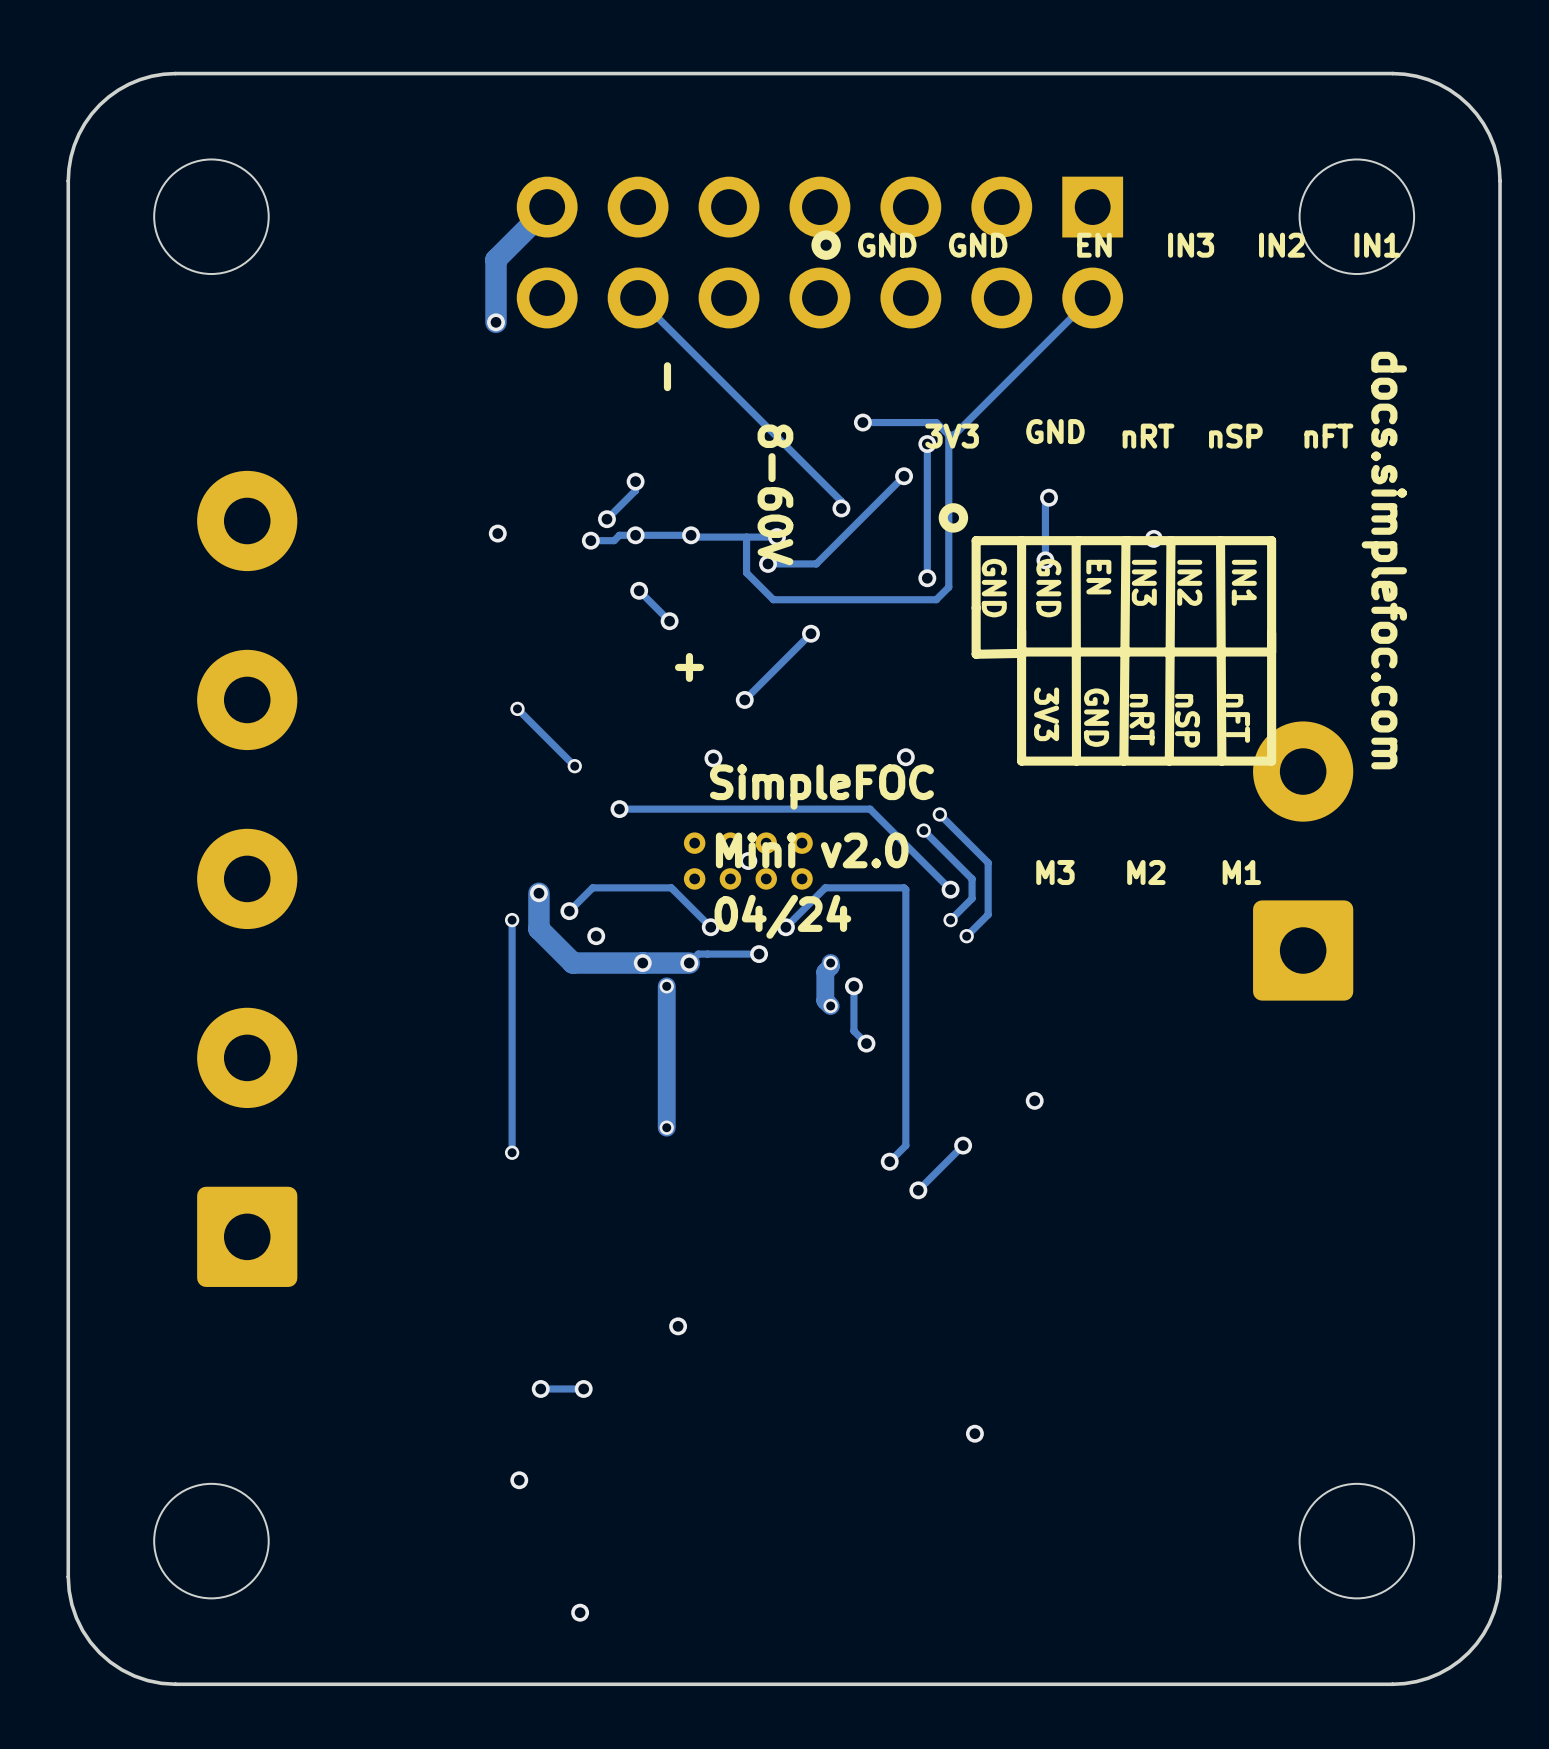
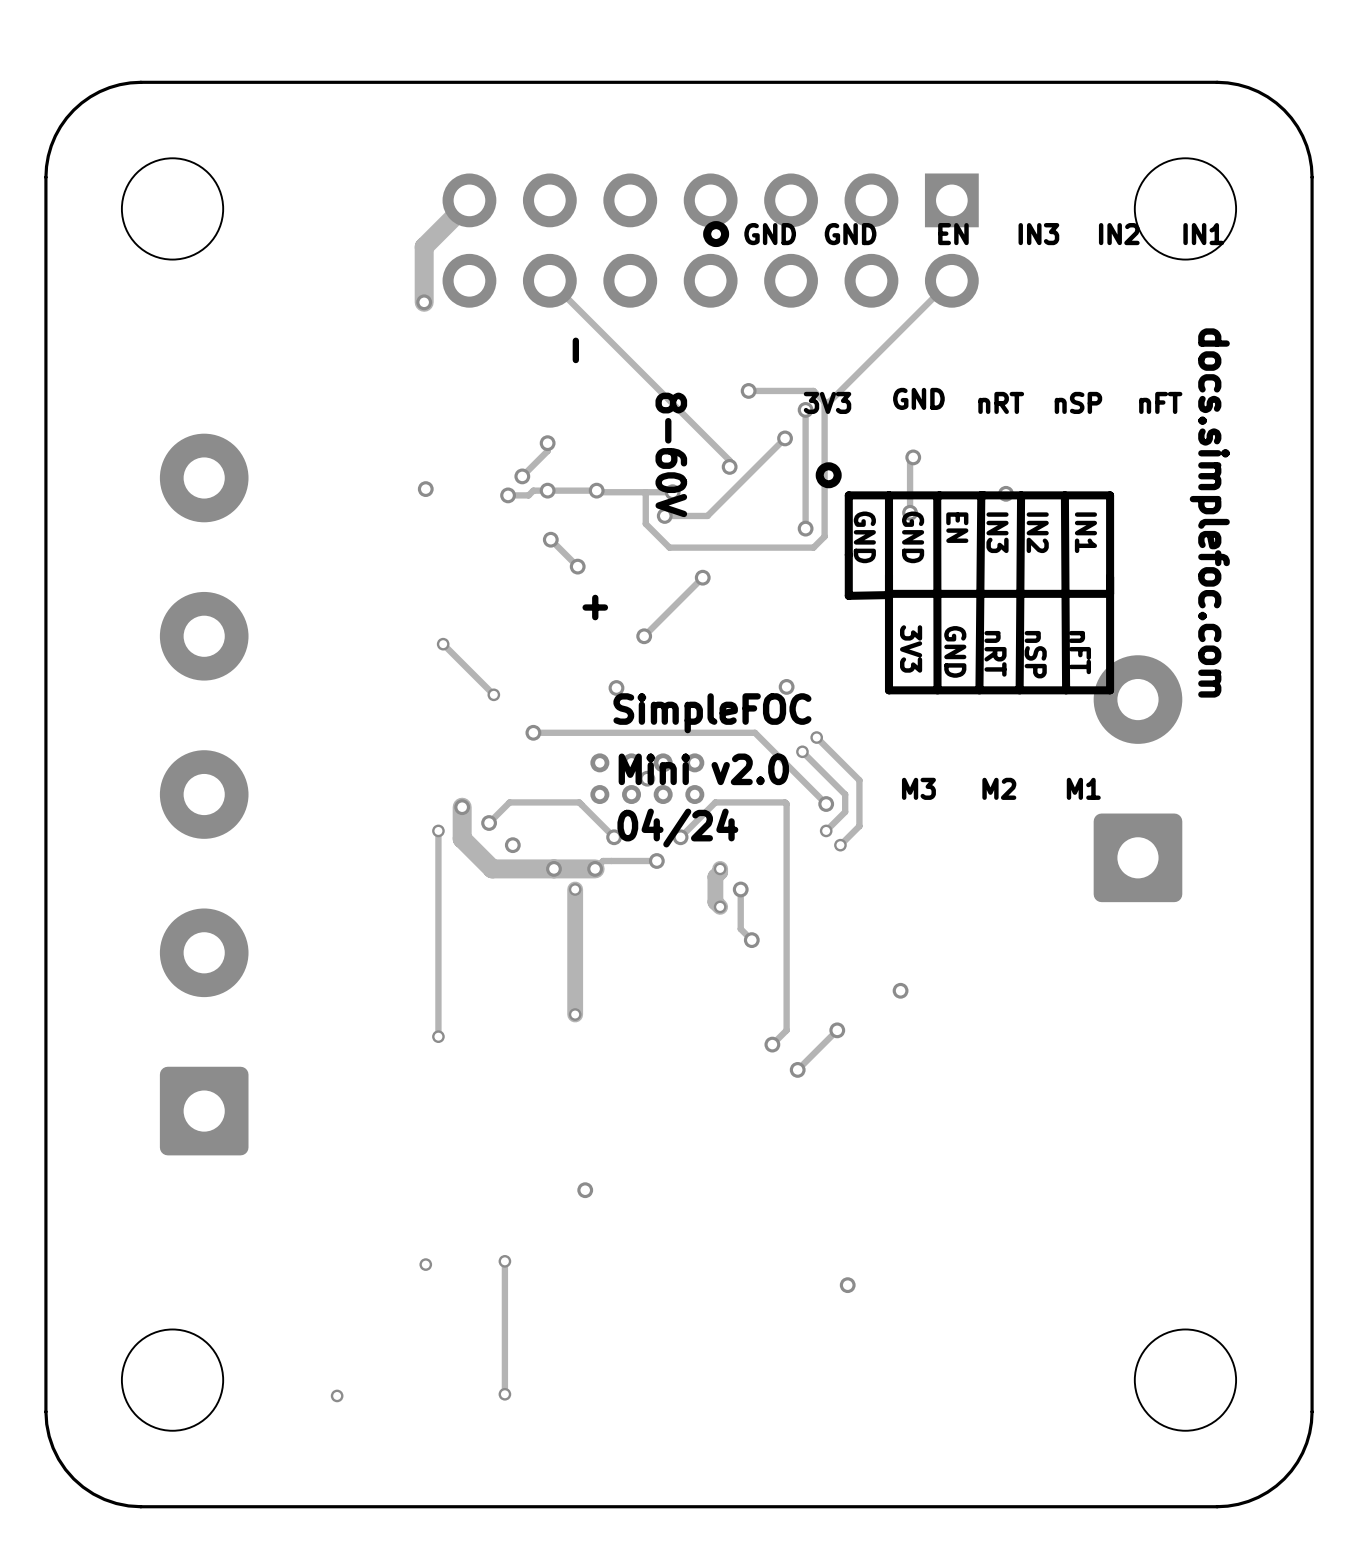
via: (540, 1388) -> none
track: (583, 1388) (540, 1388) -> none
via: (583, 1388) -> none
track: none -> (504, 1261) (504, 1394)
via: none -> (504, 1261)
via: none -> (425, 1264)
via: (519, 1480) -> none
via: none -> (504, 1394)
via: none -> (337, 1395)
via: (580, 1612) -> none

